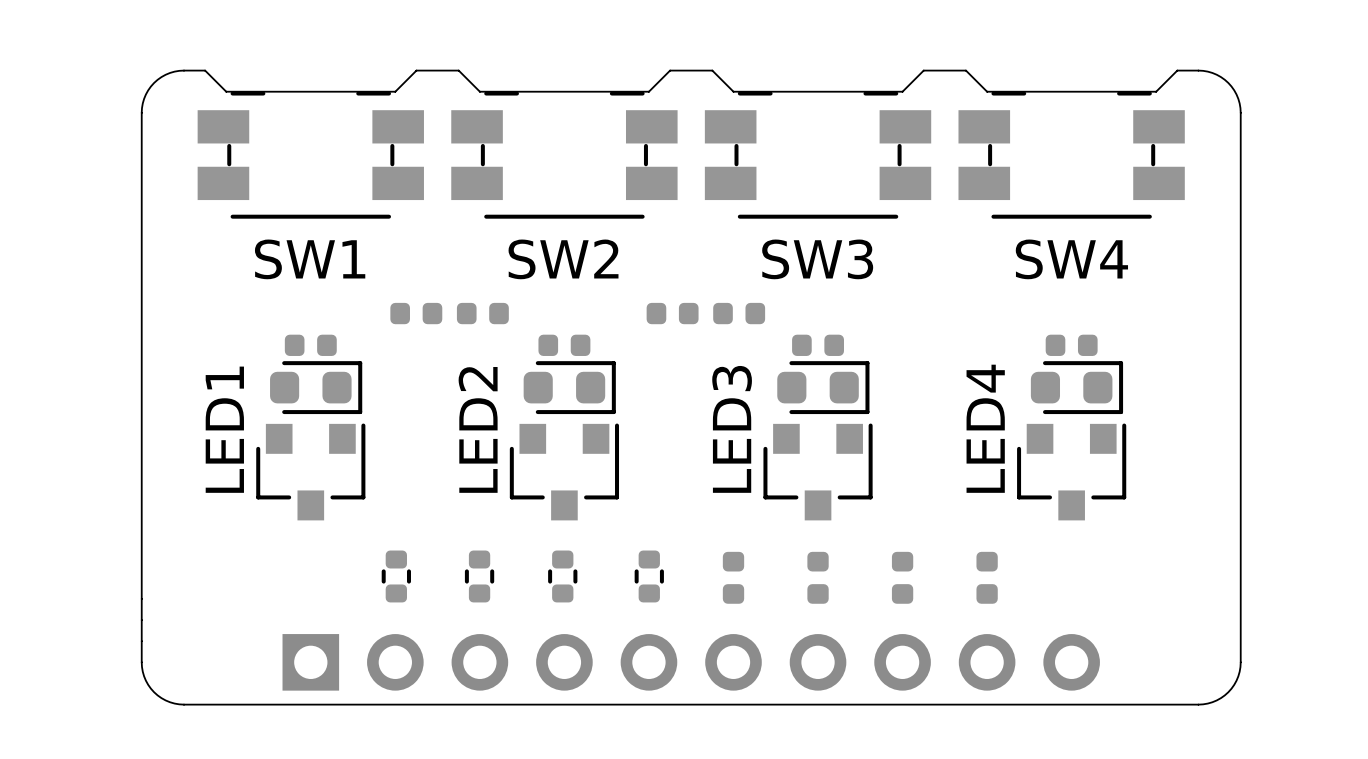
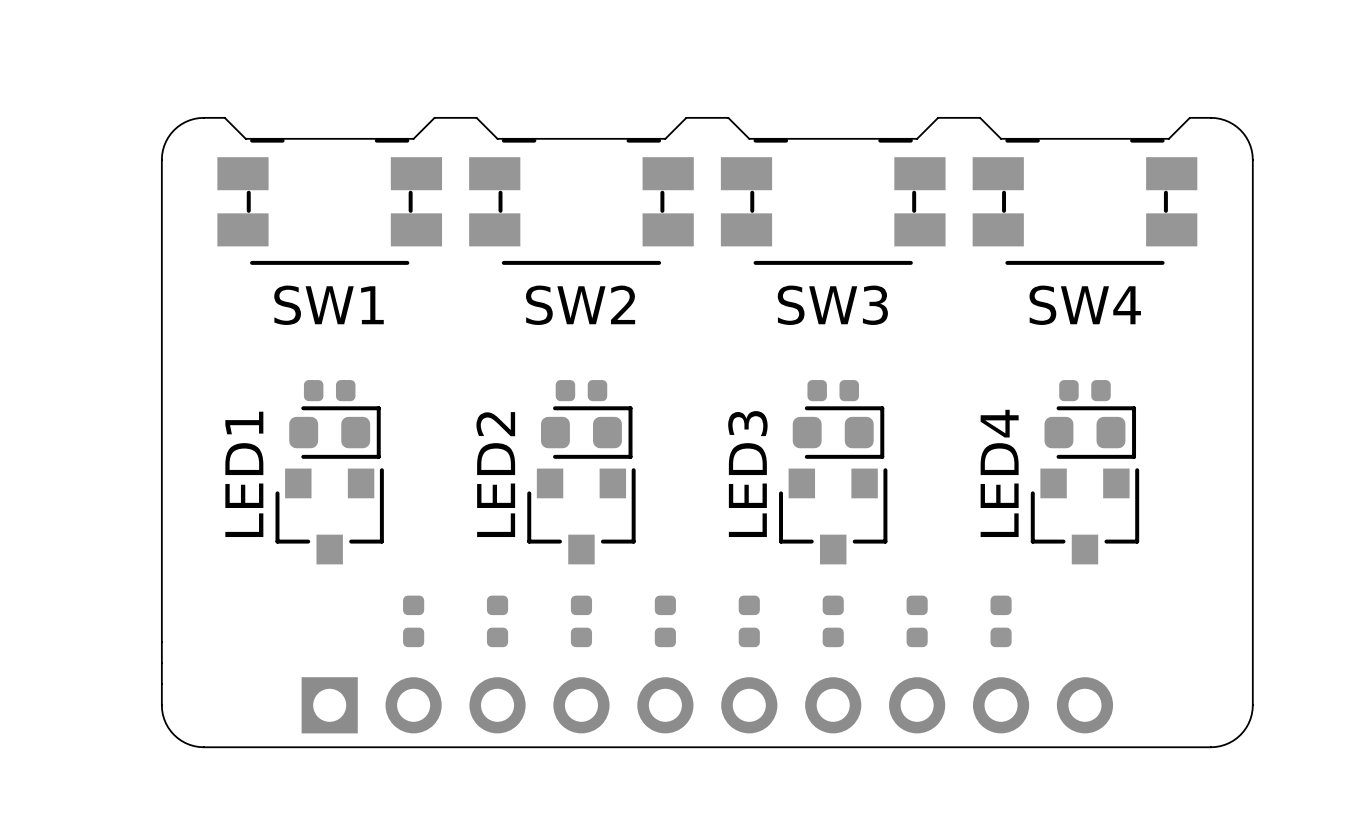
part: (416, 313) -> none
part: (482, 313) -> none
part: (672, 313) -> none
part: (739, 313) -> none
part footprint: [381, 550, 411, 603] -> [403, 595, 425, 648]
part footprint: [464, 550, 495, 603] -> [486, 595, 509, 648]
part footprint: [548, 550, 578, 603] -> [570, 595, 593, 648]
part footprint: [634, 550, 664, 603] -> [654, 595, 676, 648]

